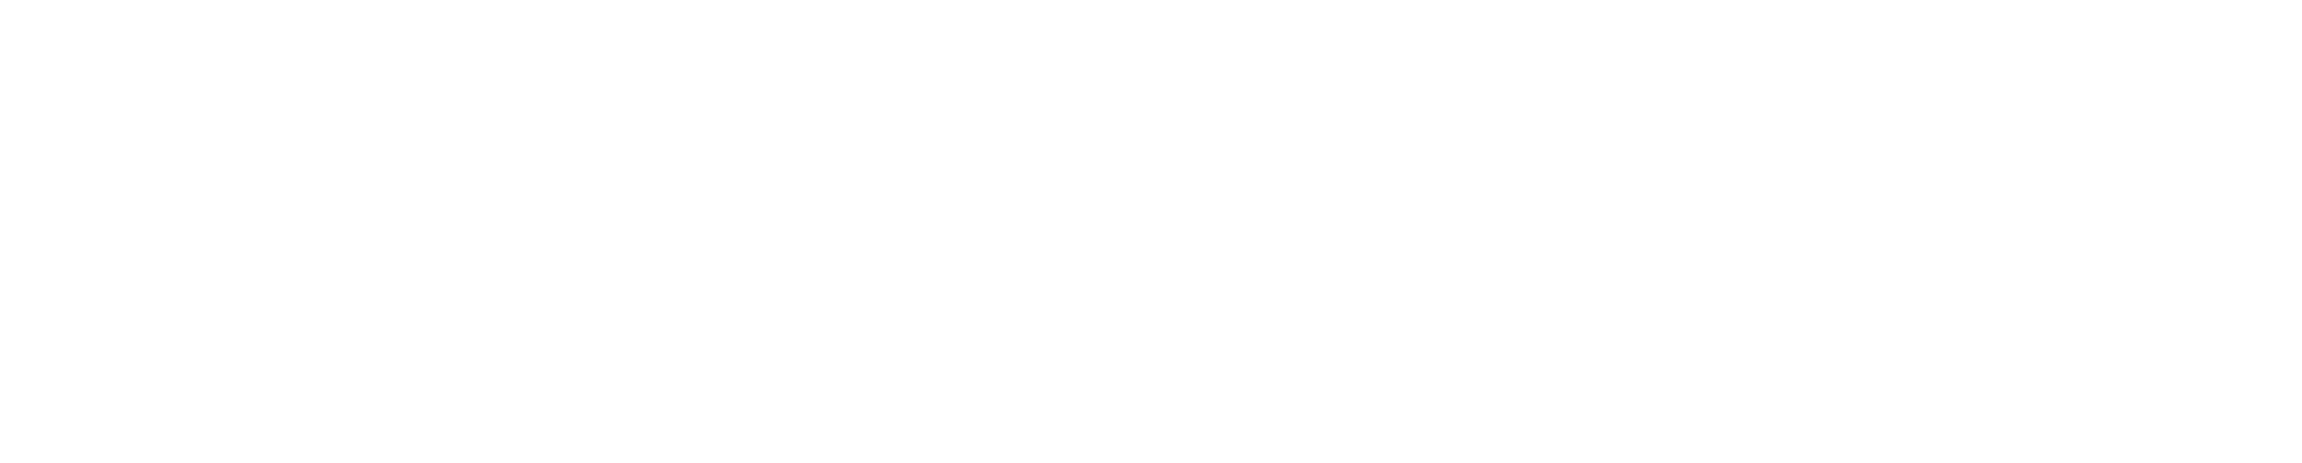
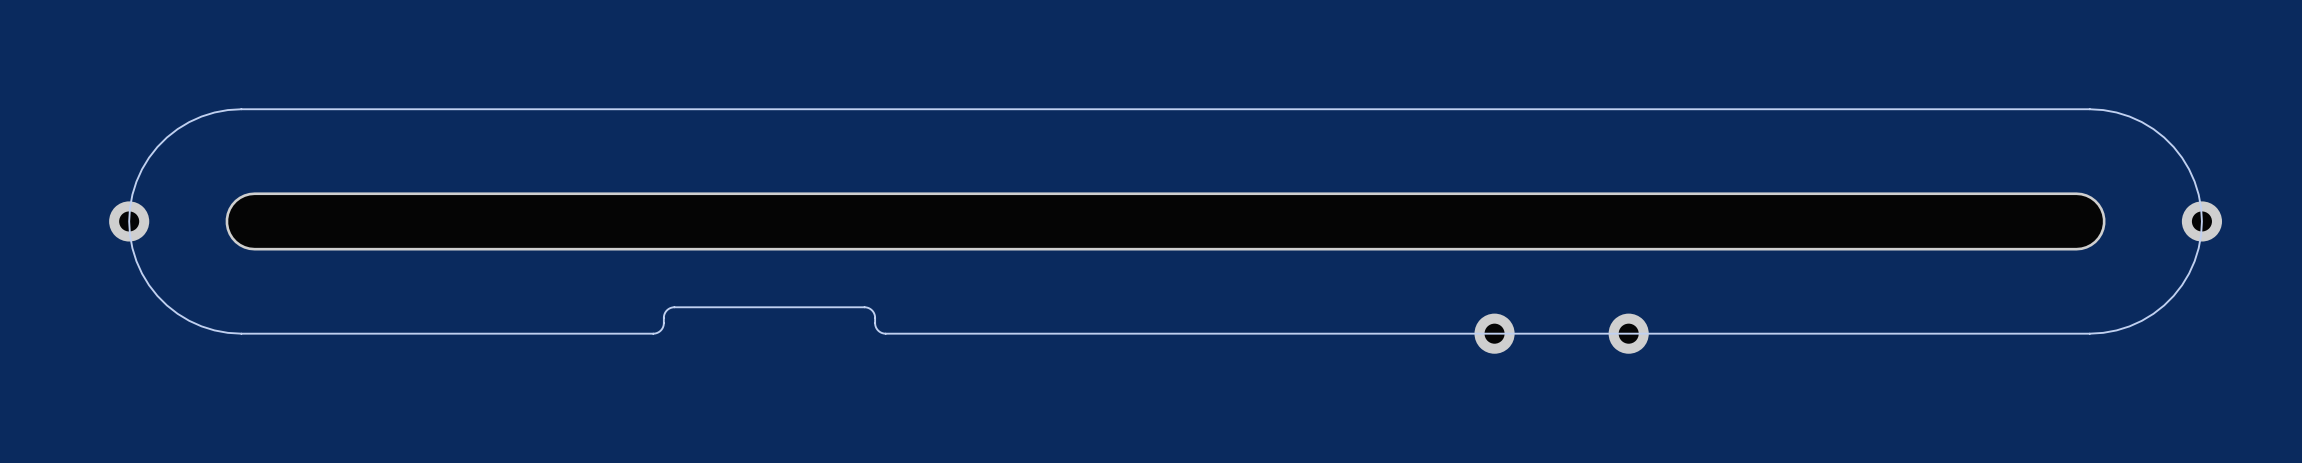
board edge: none -> (2089, 109) (227, 110) (201, 116) (189, 122) (177, 129) (157, 147) (142, 169) (132, 194) (129, 207) (129, 234) (136, 261) (142, 273) (157, 295) (166, 305) (177, 313) (201, 326) (227, 332) (241, 333) (654, 333) (662, 327) (666, 311) (674, 307) (865, 307) (874, 313) (877, 329) (885, 333) (2103, 332) (2129, 326) (2141, 320) (2164, 305) (2173, 295) (2189, 273) (2194, 261) (2201, 234) (2201, 221) (2201, 207) (2194, 181) (2189, 169) (2173, 147) (2164, 137) (2141, 122) (2116, 112) (2089, 109)
part: none -> (129, 221)
part: none -> (1165, 221)
part: none -> (2201, 221)
part: none -> (1494, 333)
part: none -> (1628, 333)

